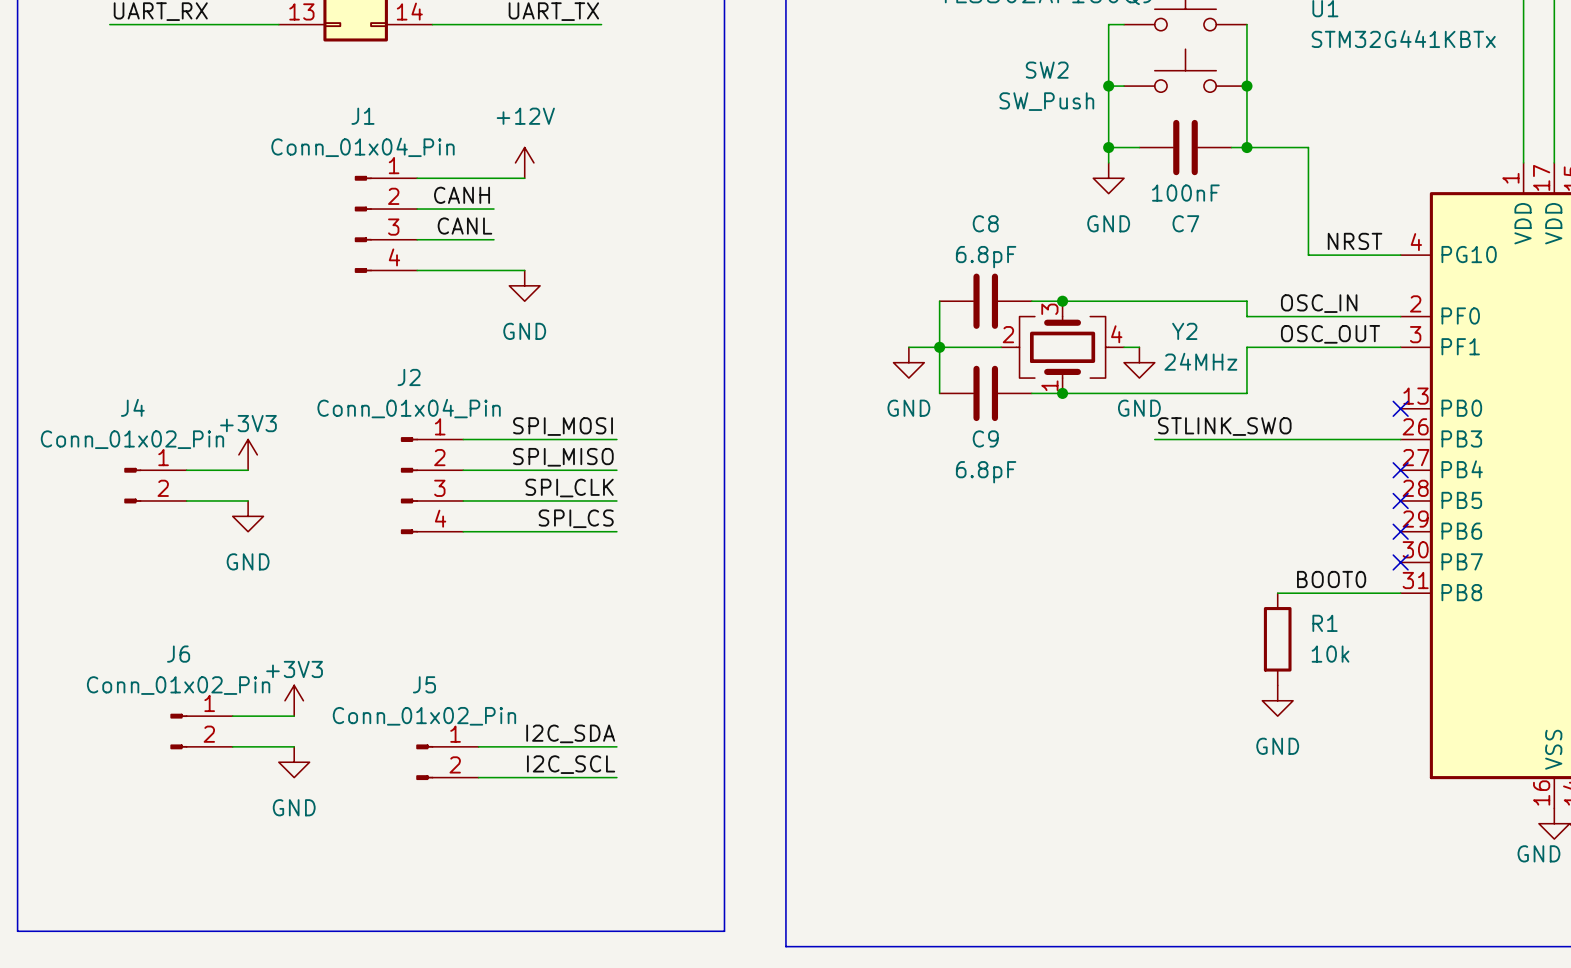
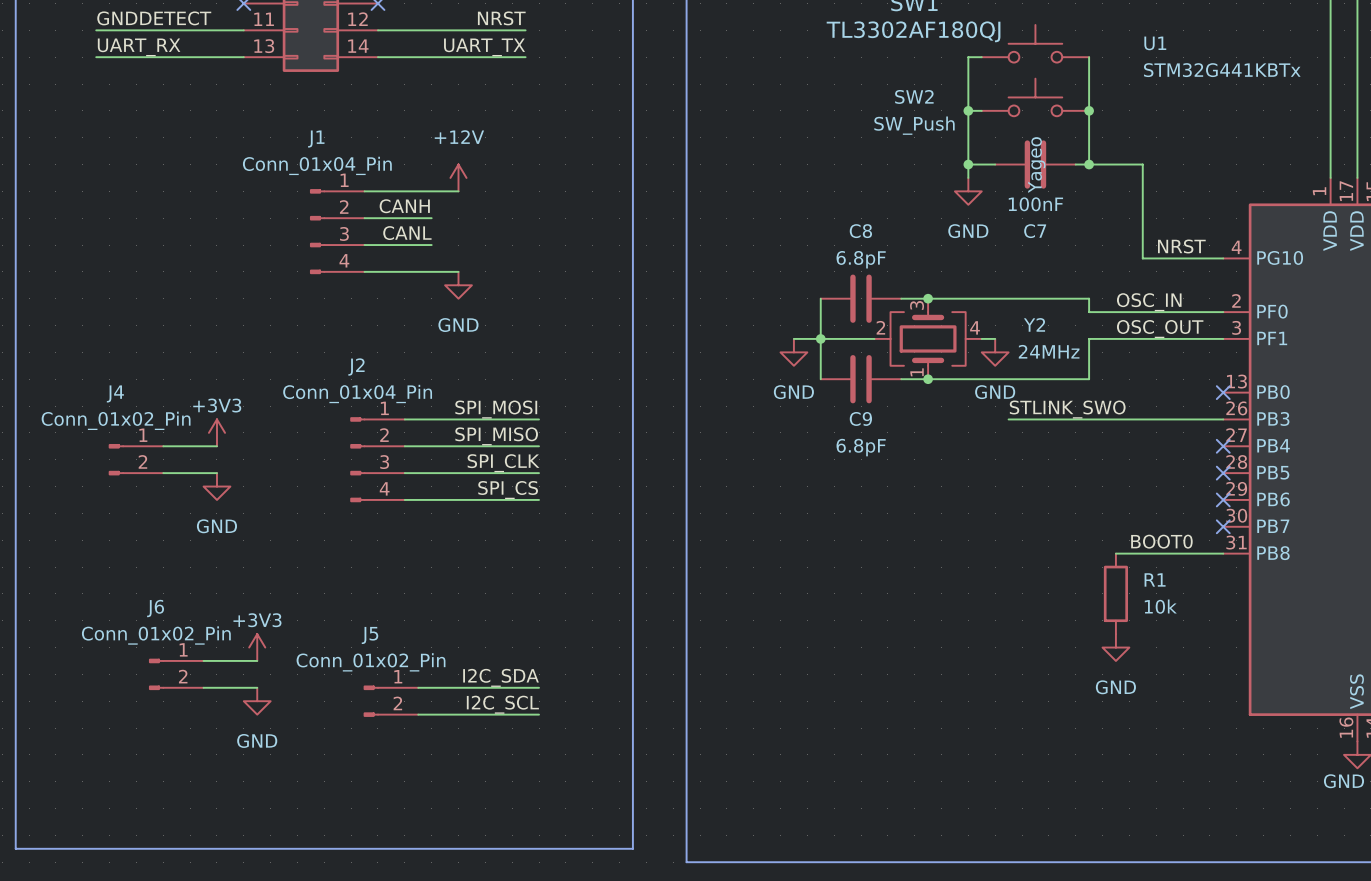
C7 text: none -> Yageo (1036, 165)

